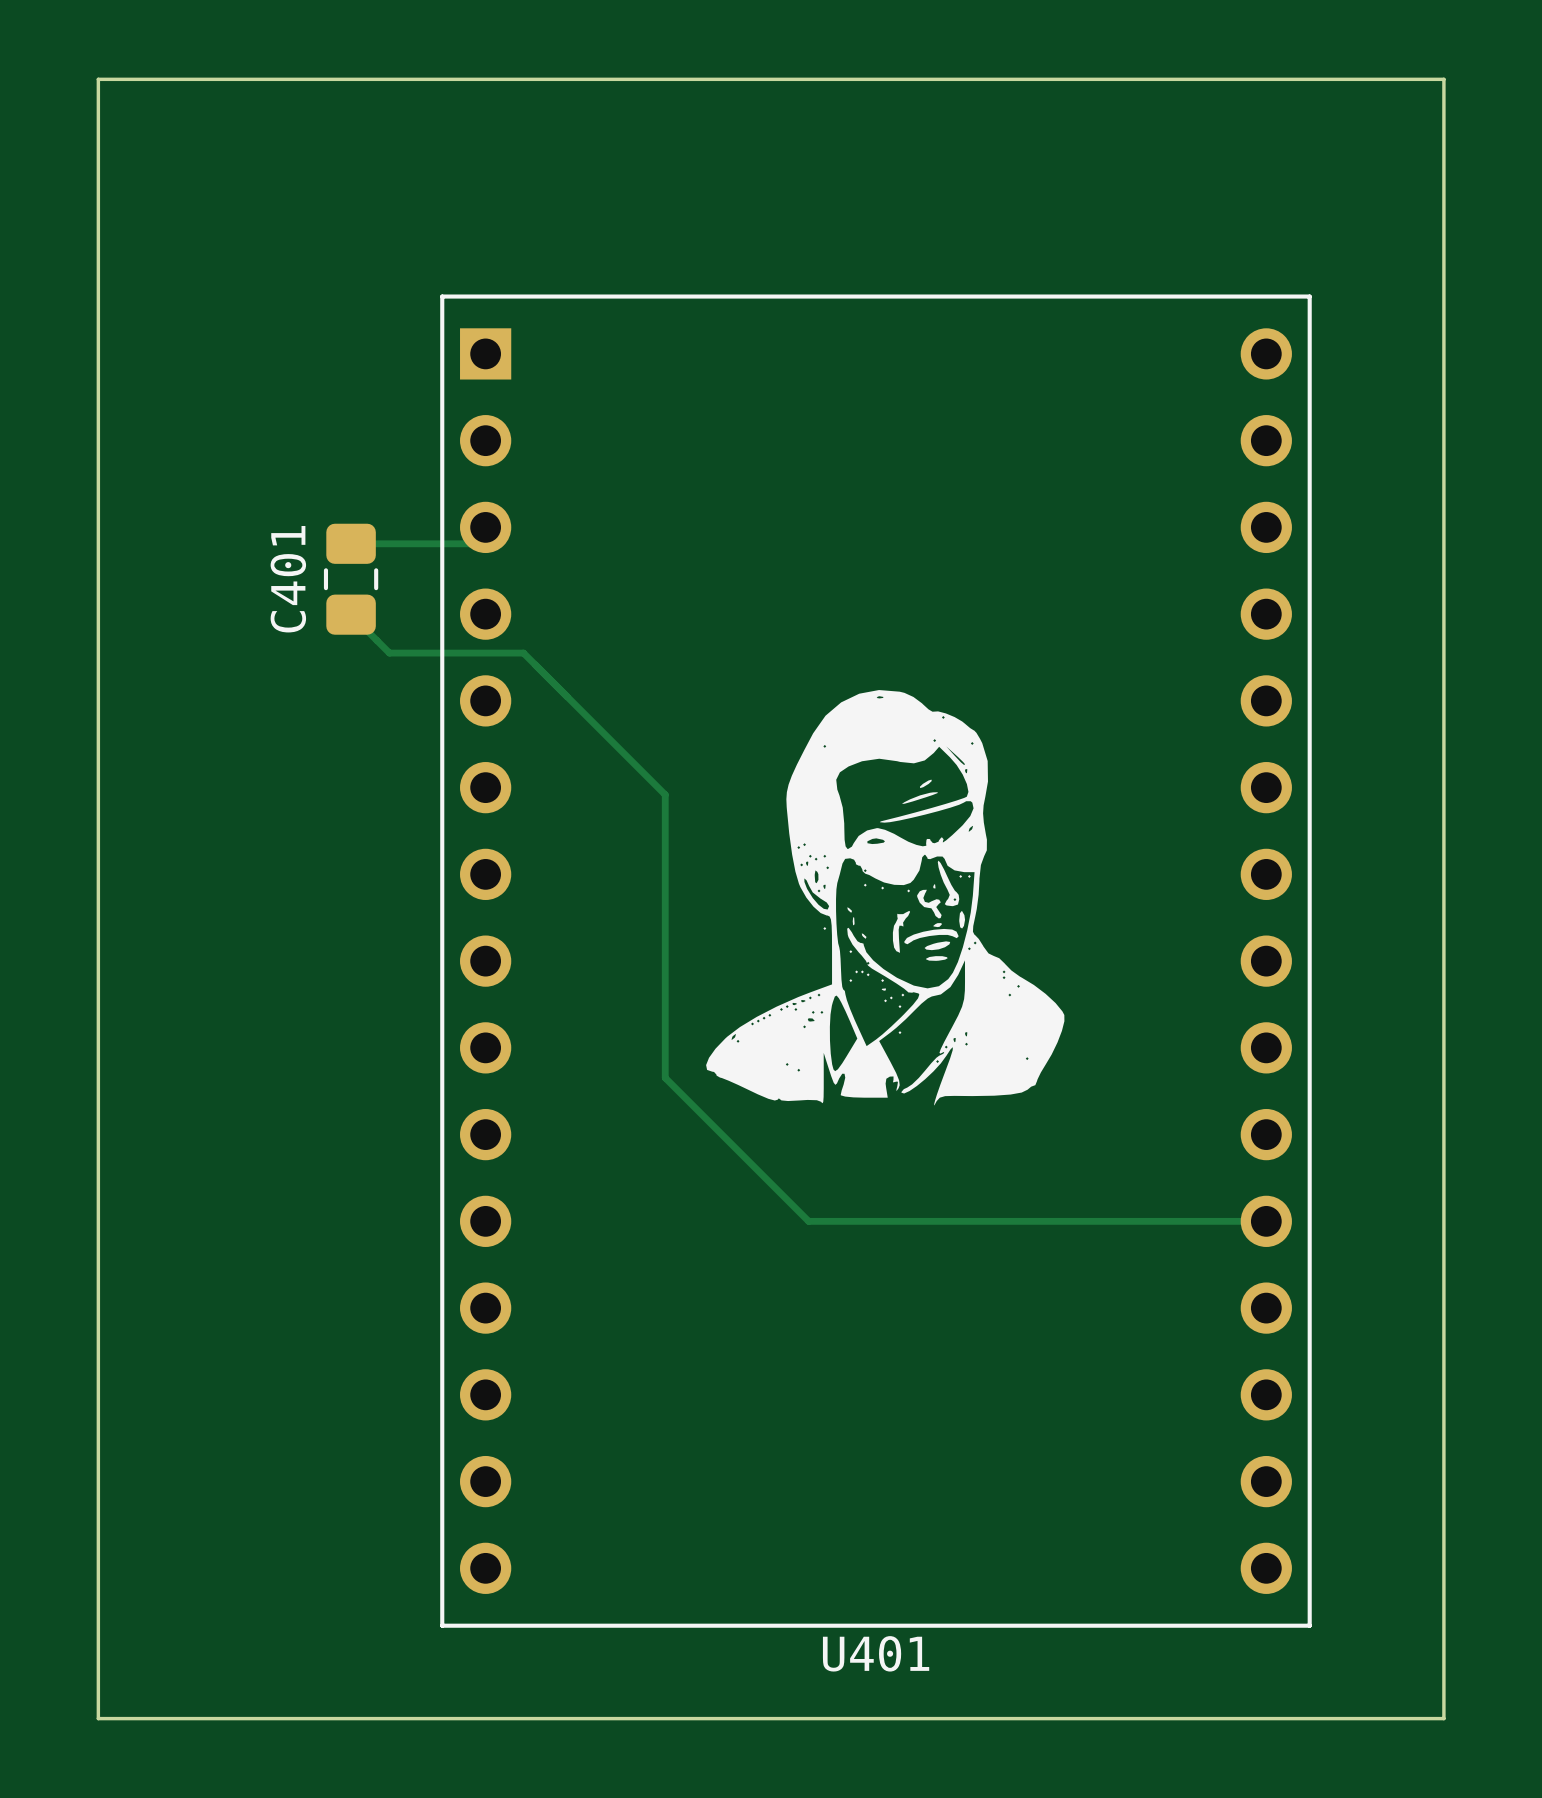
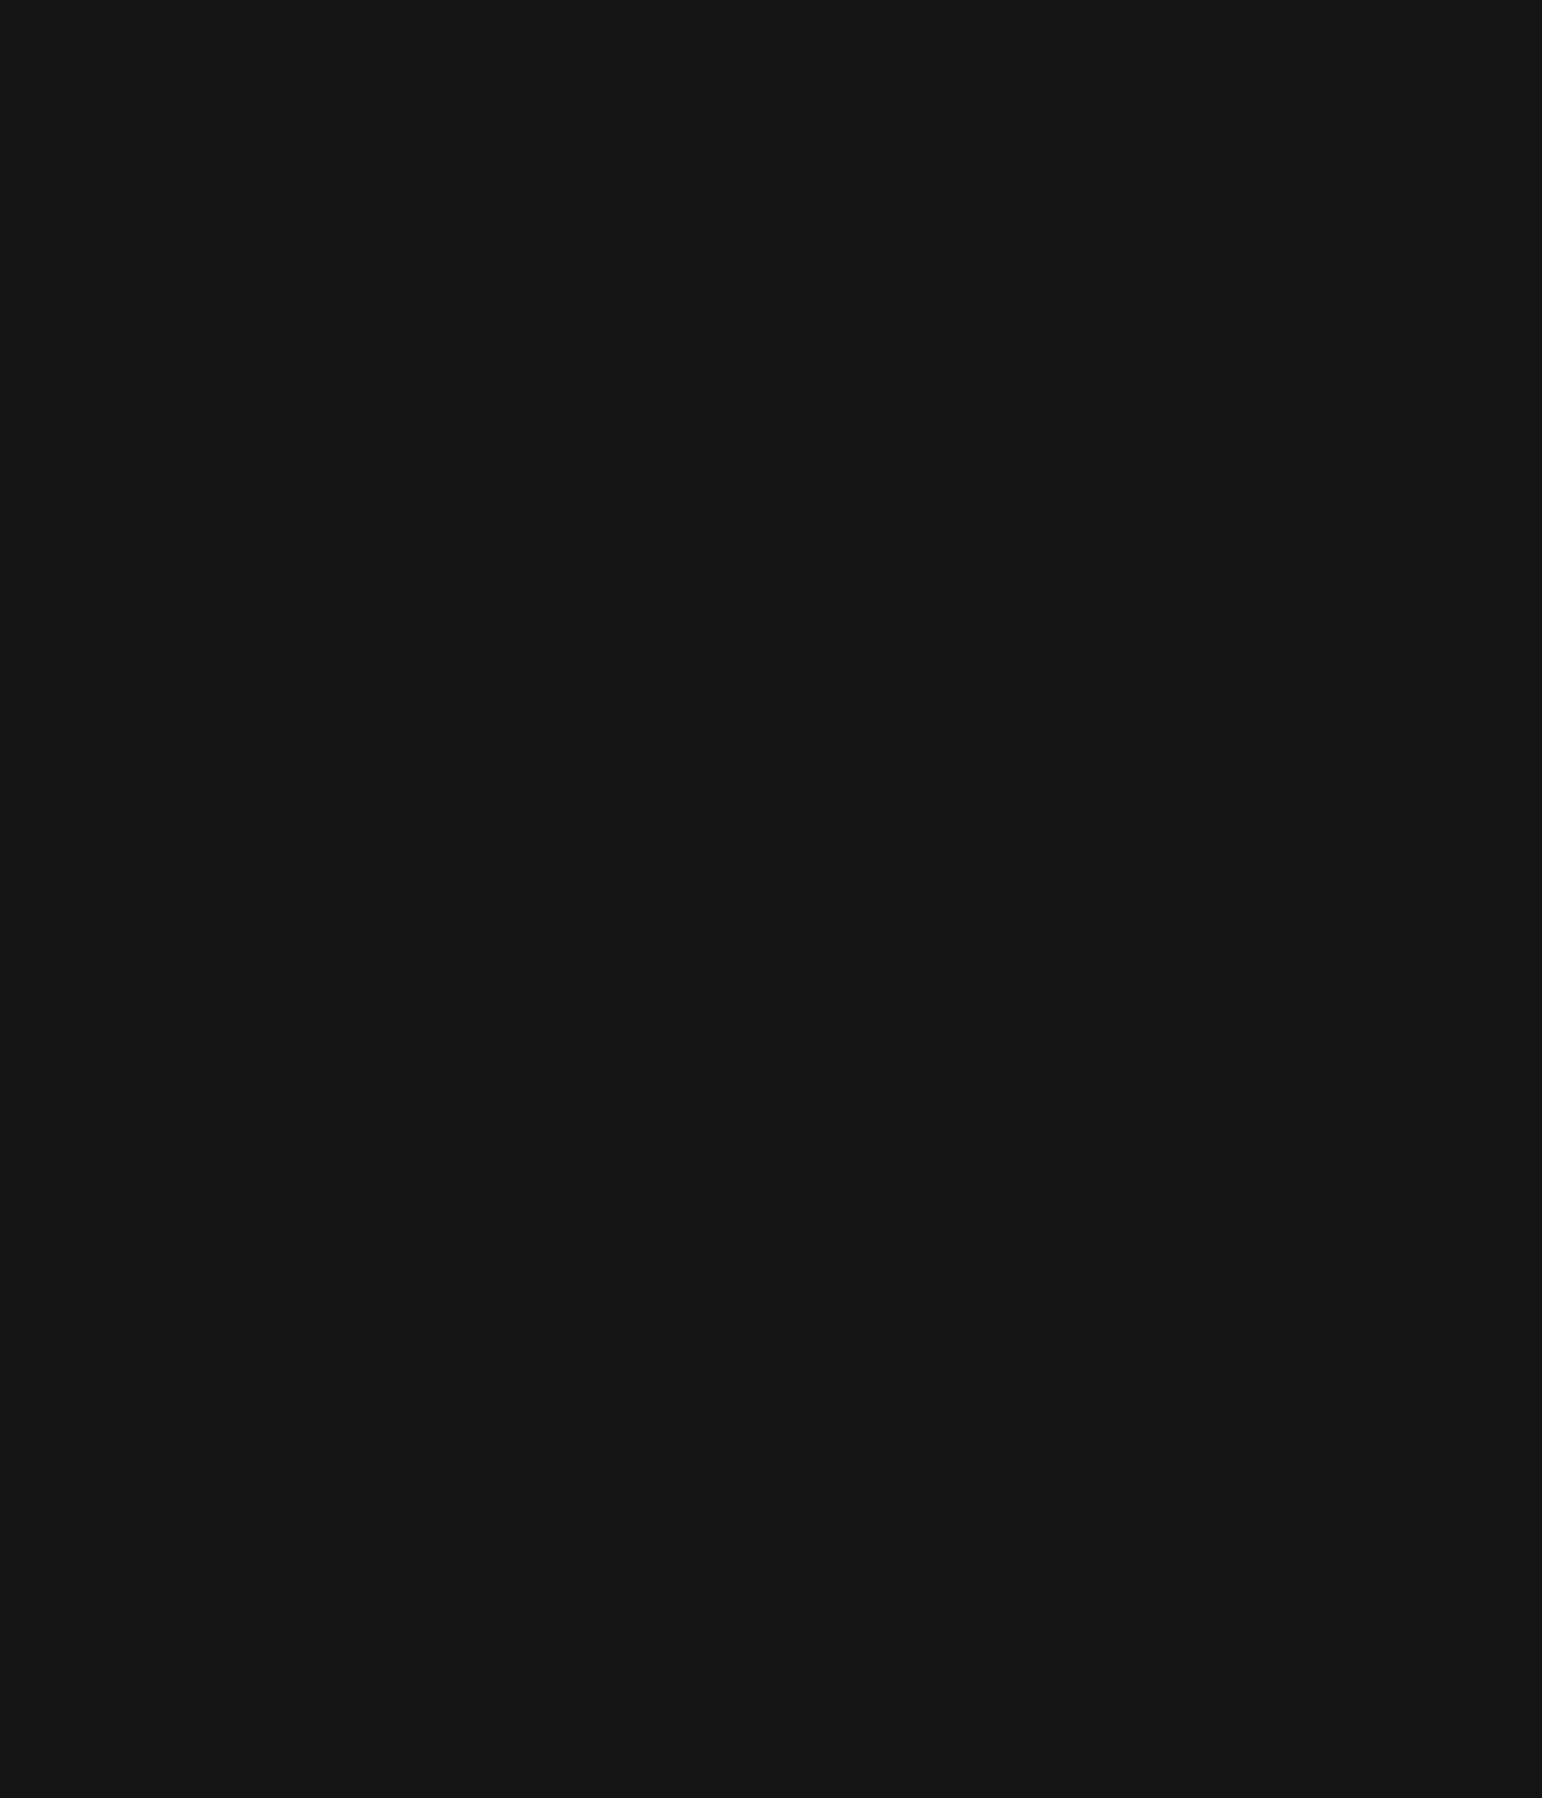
board edge: (98, 79) (1443, 79) (1443, 1718) (98, 1718) (98, 79) -> none
track: (351, 543) (470, 543) -> none
C401: (351, 579) -> none
track: (351, 614) (389, 653) (523, 653) (665, 794) (665, 1077) (808, 1221) (1266, 1221) -> none
drawing: [706, 690, 1065, 1106] -> none
U401: (875, 961) -> none

